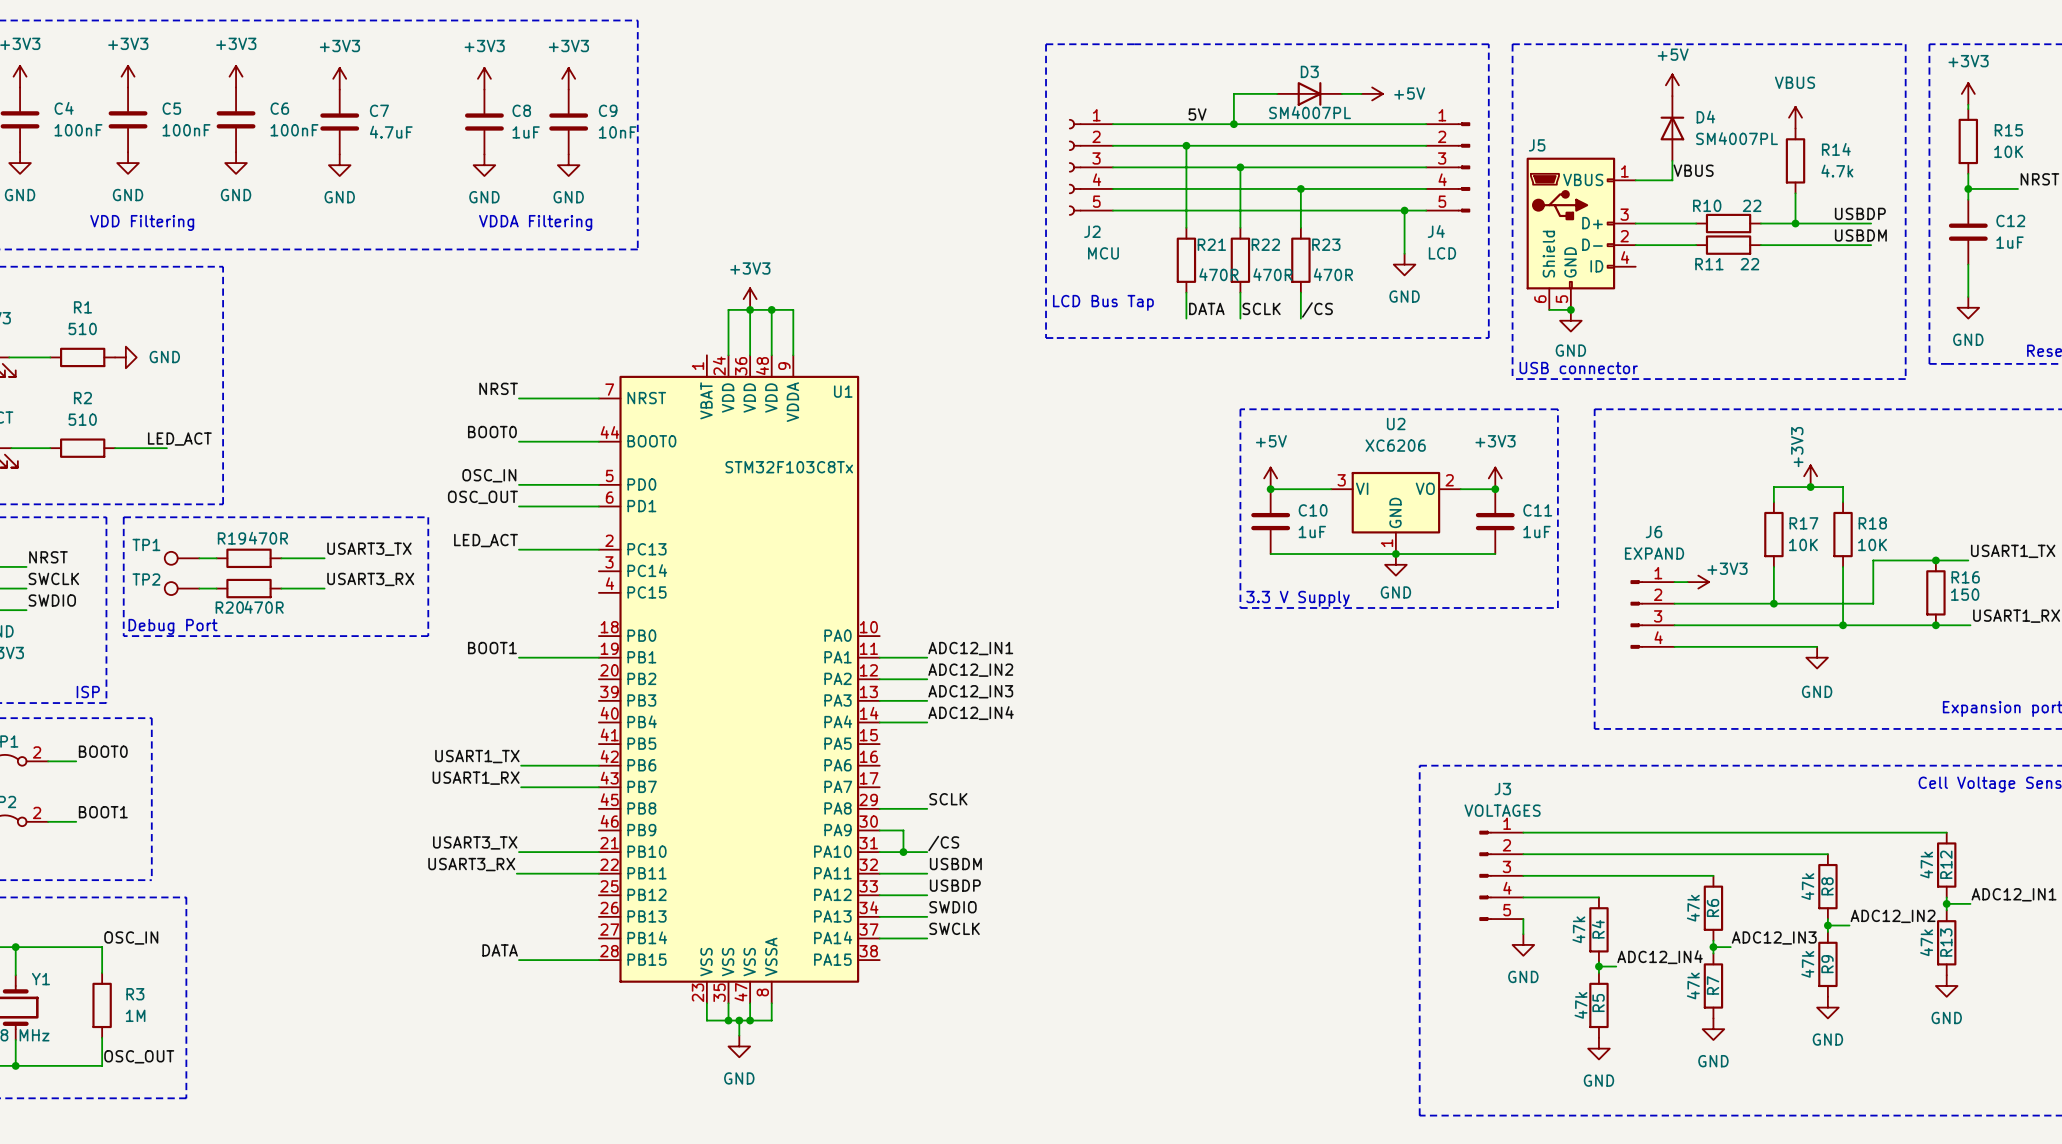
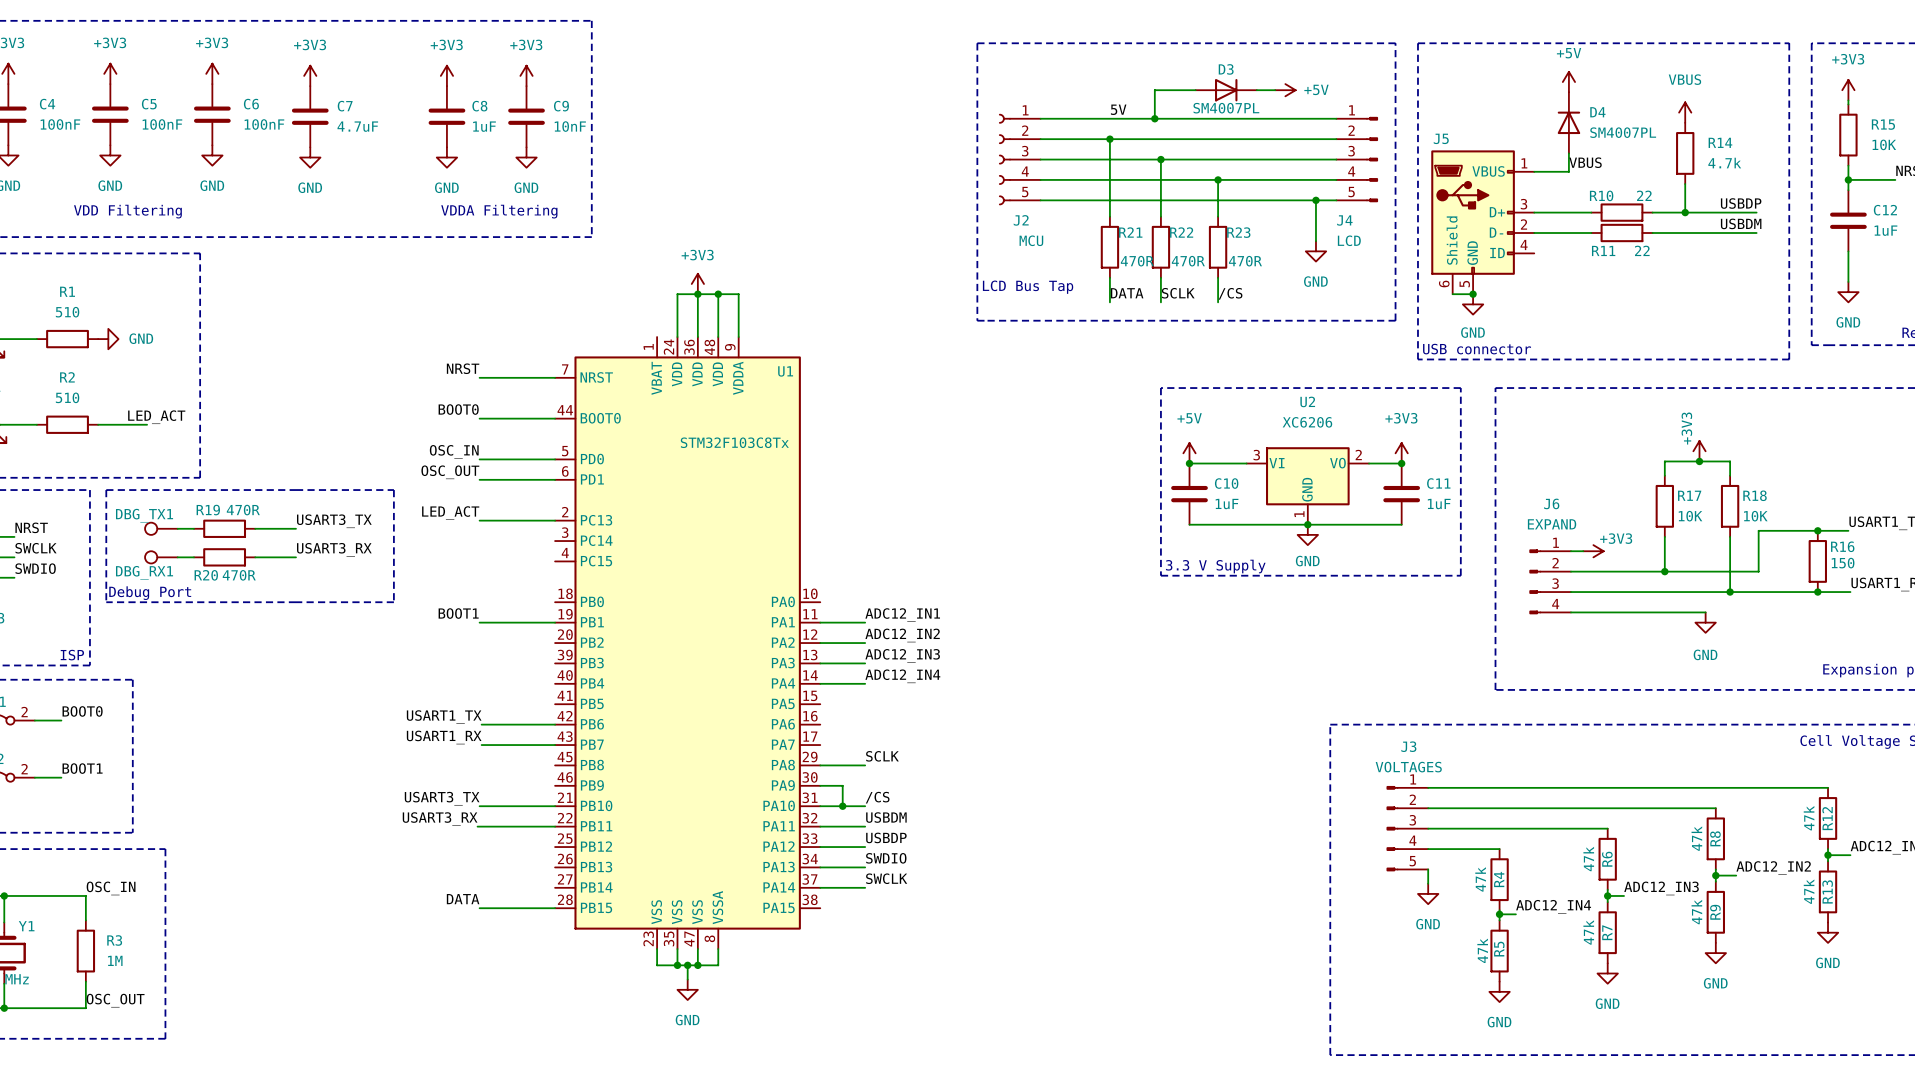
TP1 name: TP1 (146, 544) -> DBG_TX1 (144, 515)
TP2 name: TP2 (146, 579) -> DBG_RX1 (144, 572)

